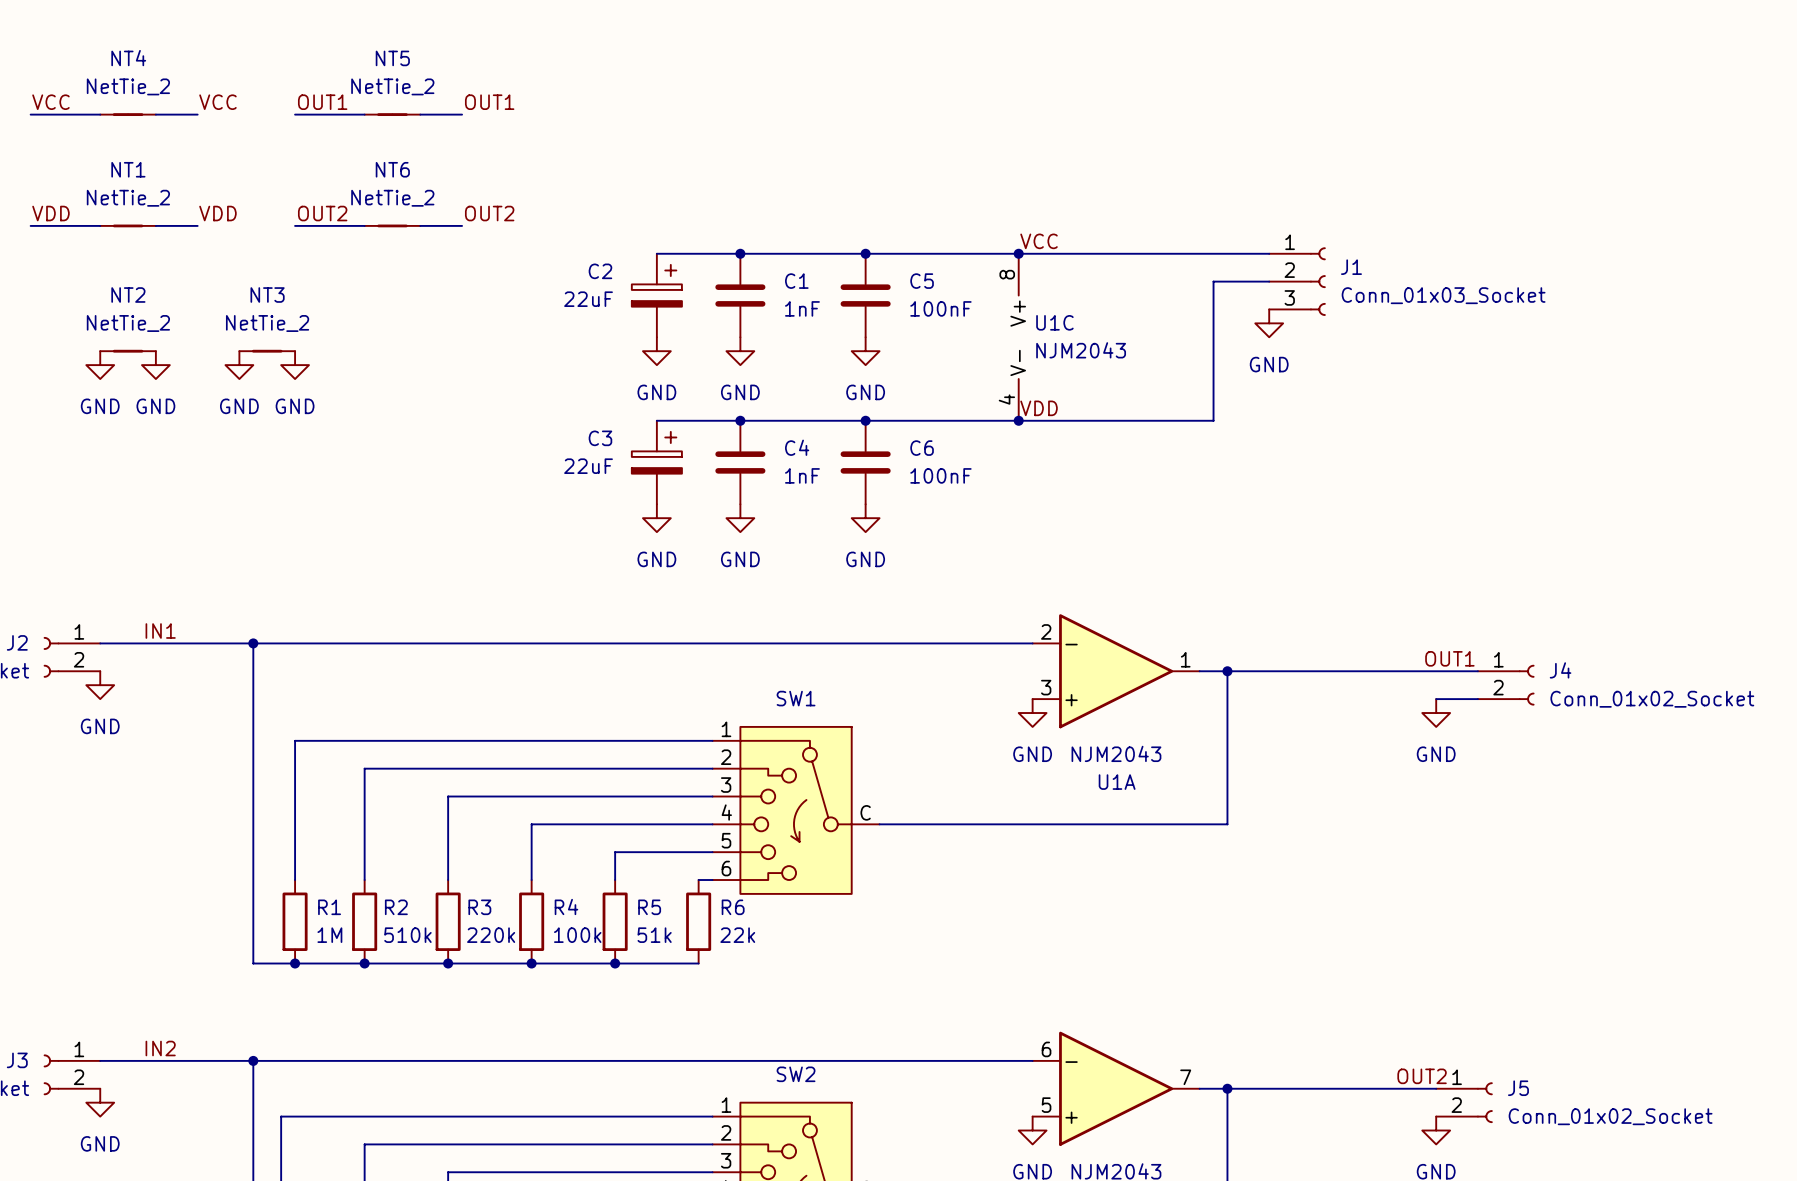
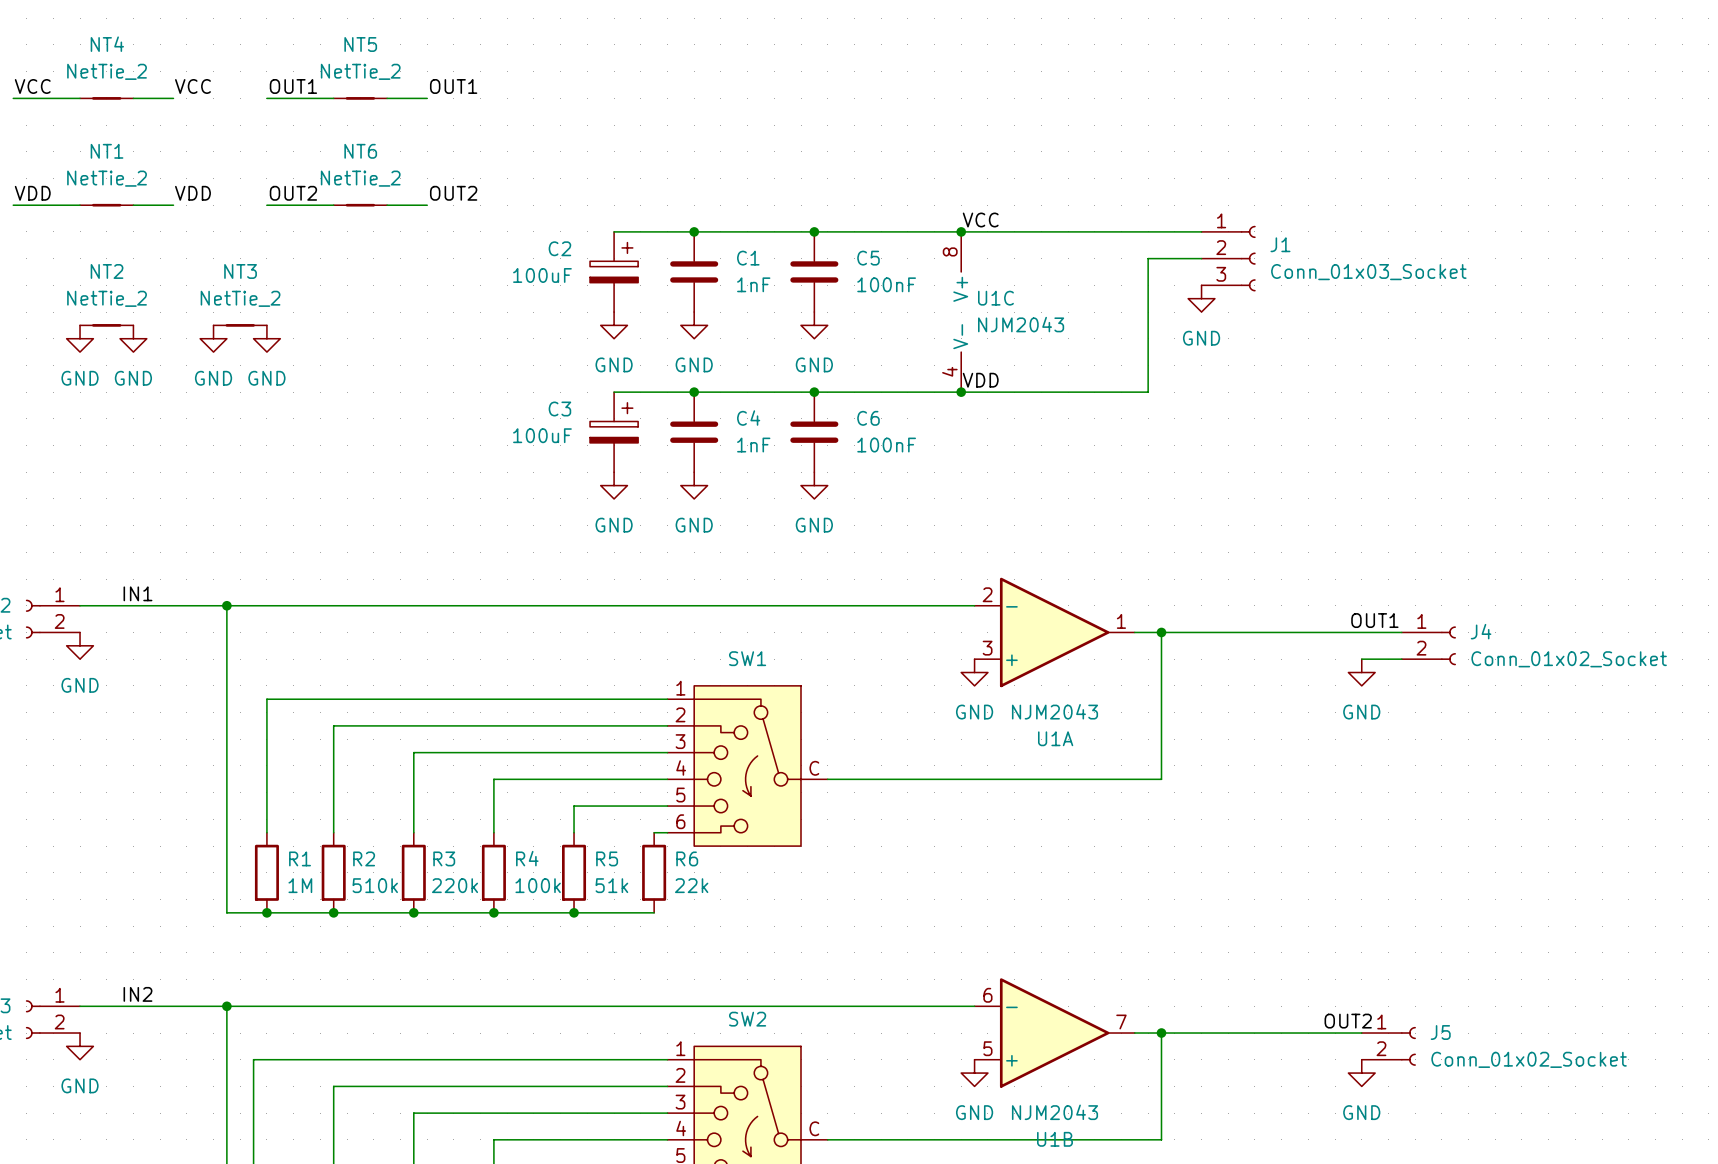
C2 value: 22uF (588, 299) -> 100uF (542, 275)
C3 value: 22uF (588, 466) -> 100uF (542, 435)

